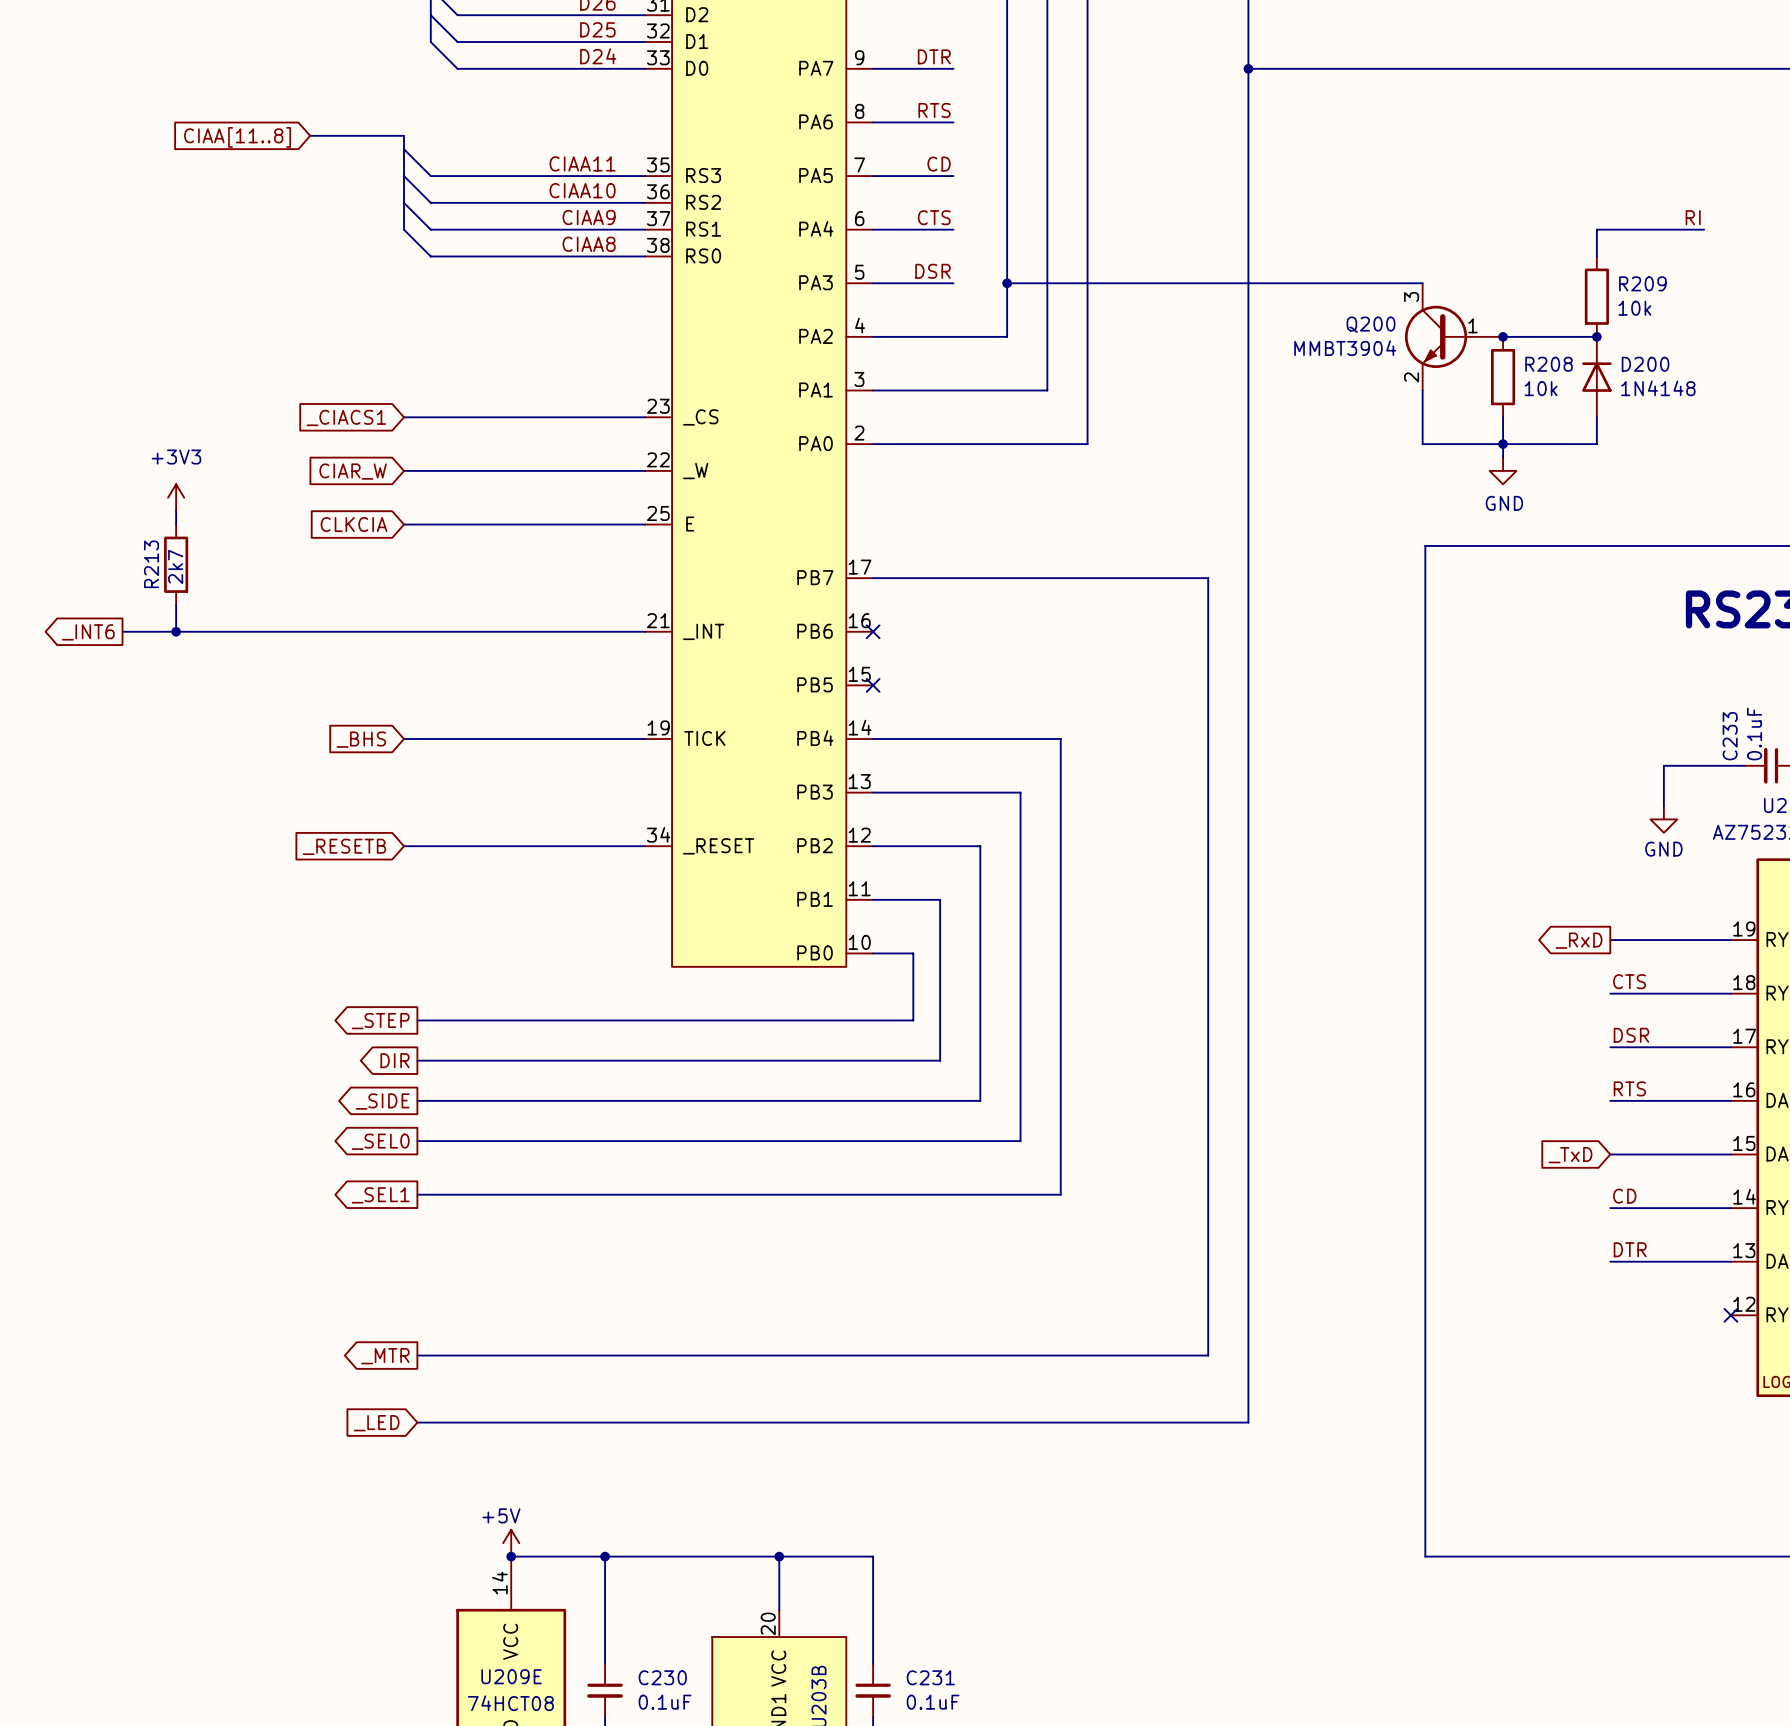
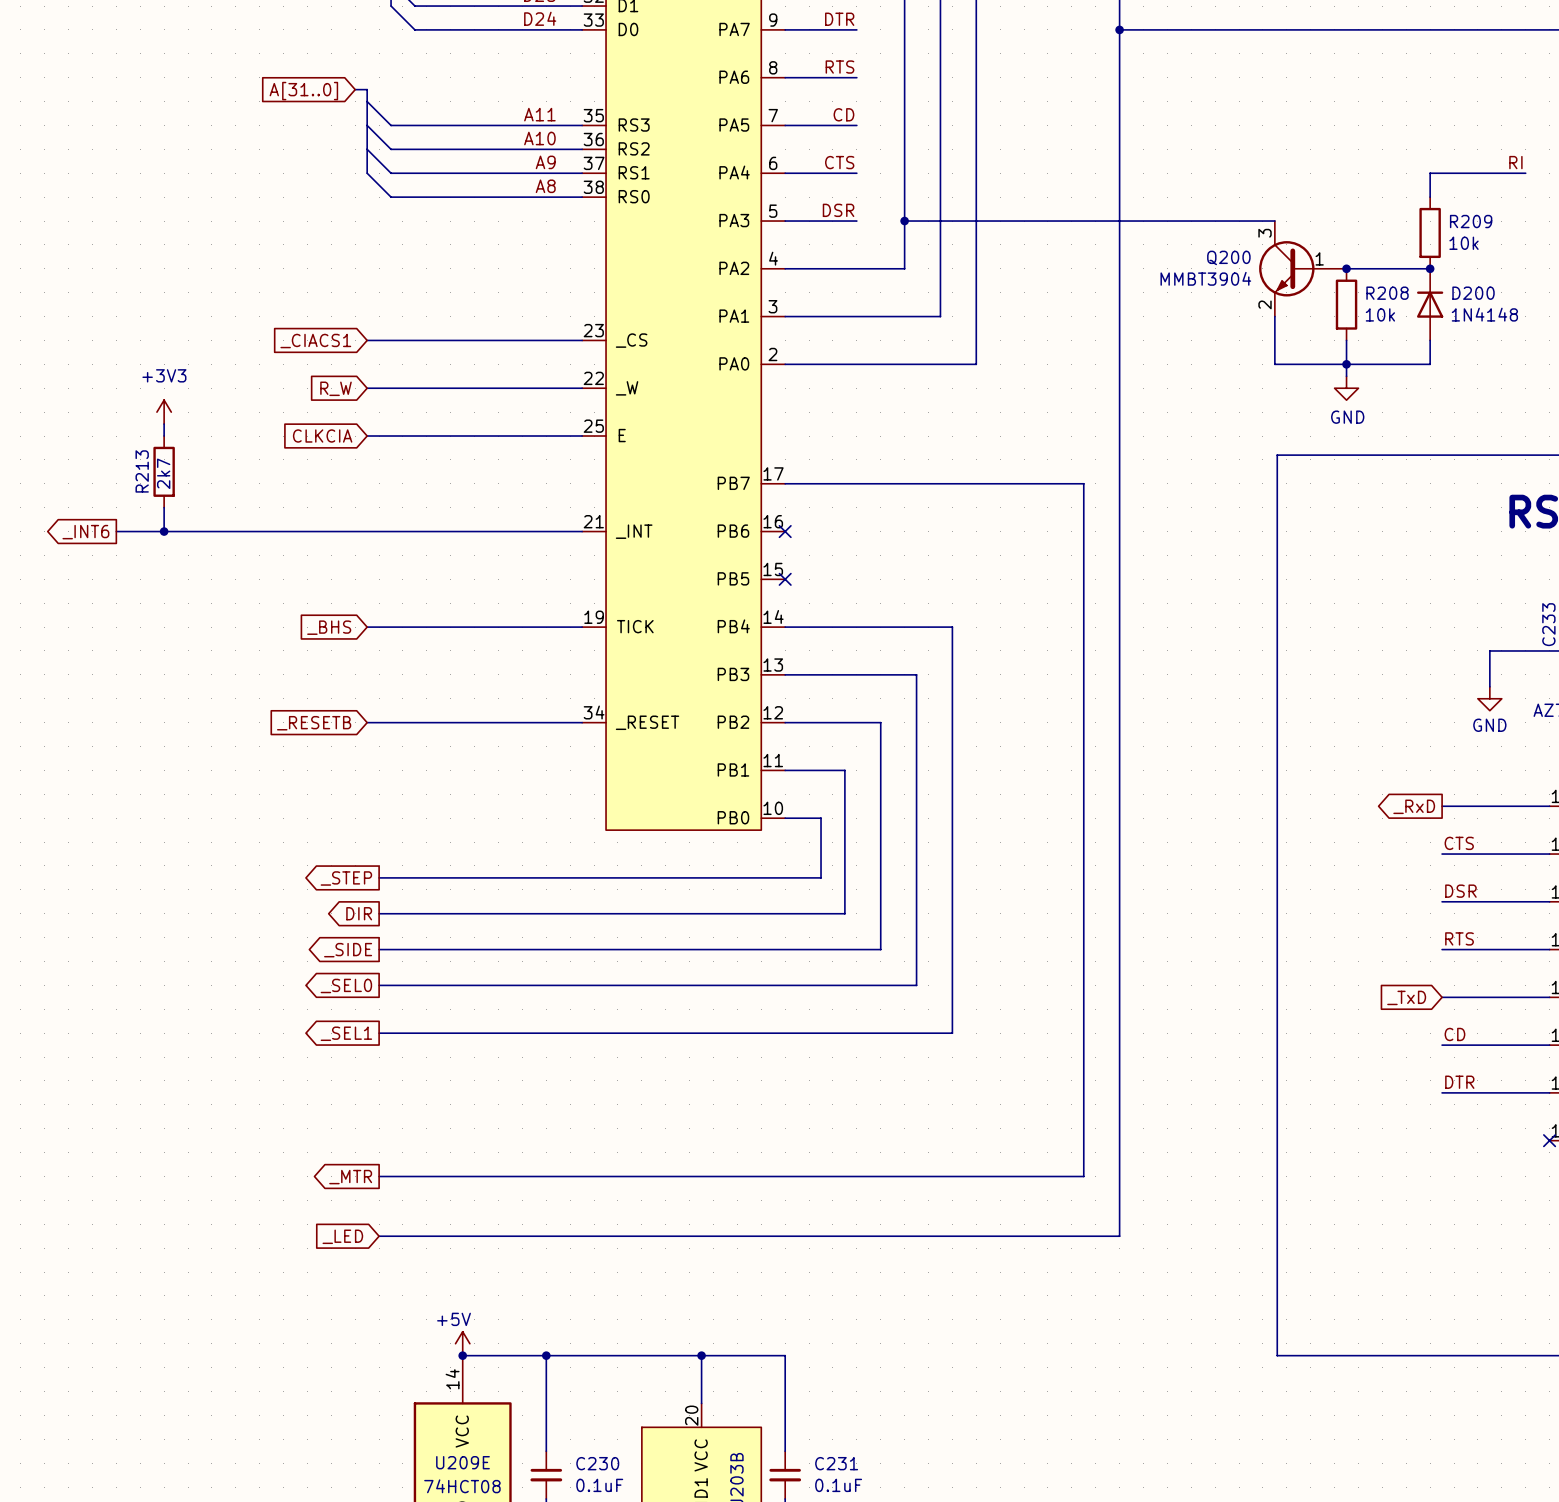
bus: (310, 135) (390, 135) -> none
global label: CIAA[11..8] (237, 137) -> A[31..0] (303, 91)
label: CIAA11 (582, 163) -> A11 (539, 114)
label: CIAA10 (582, 190) -> A10 (539, 138)
label: CIAA9 (589, 217) -> A9 (545, 162)
label: CIAA8 (589, 244) -> A8 (545, 186)
global label: CIAR_W (353, 471) -> R_W (336, 388)

